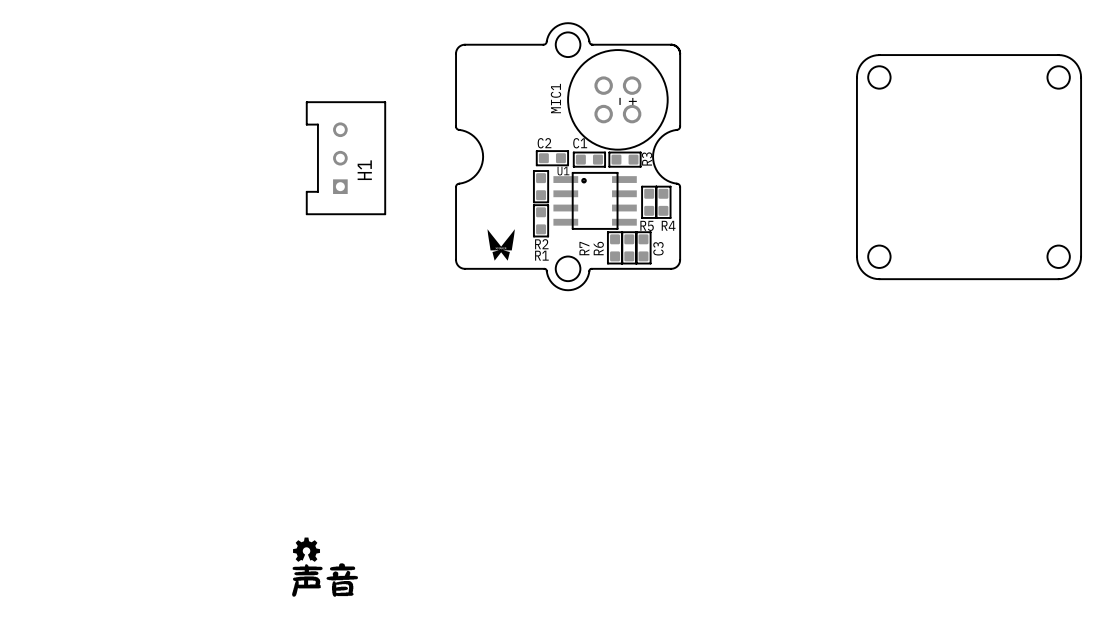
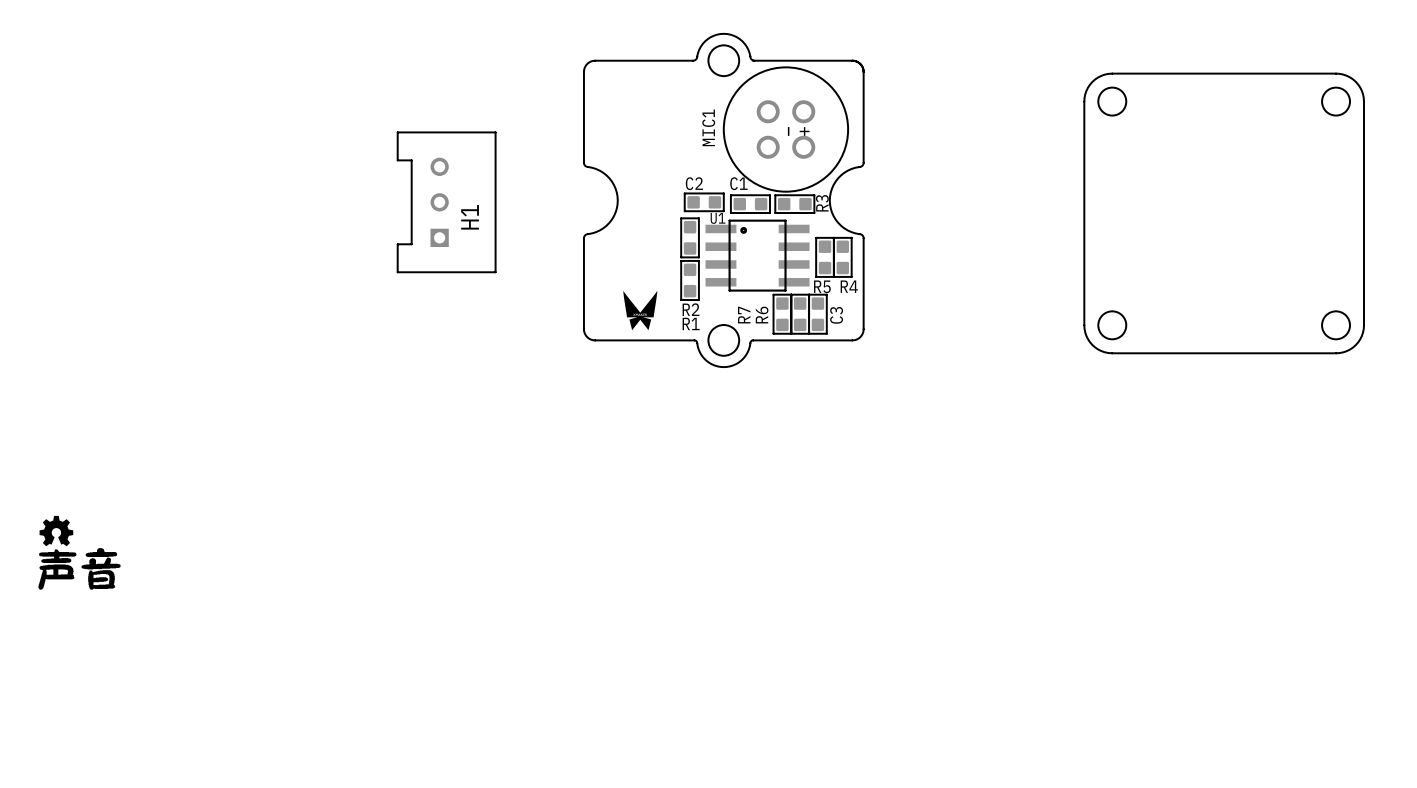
drawing: none -> [38, 515, 121, 590]
drawing: [292, 537, 358, 597] -> none

